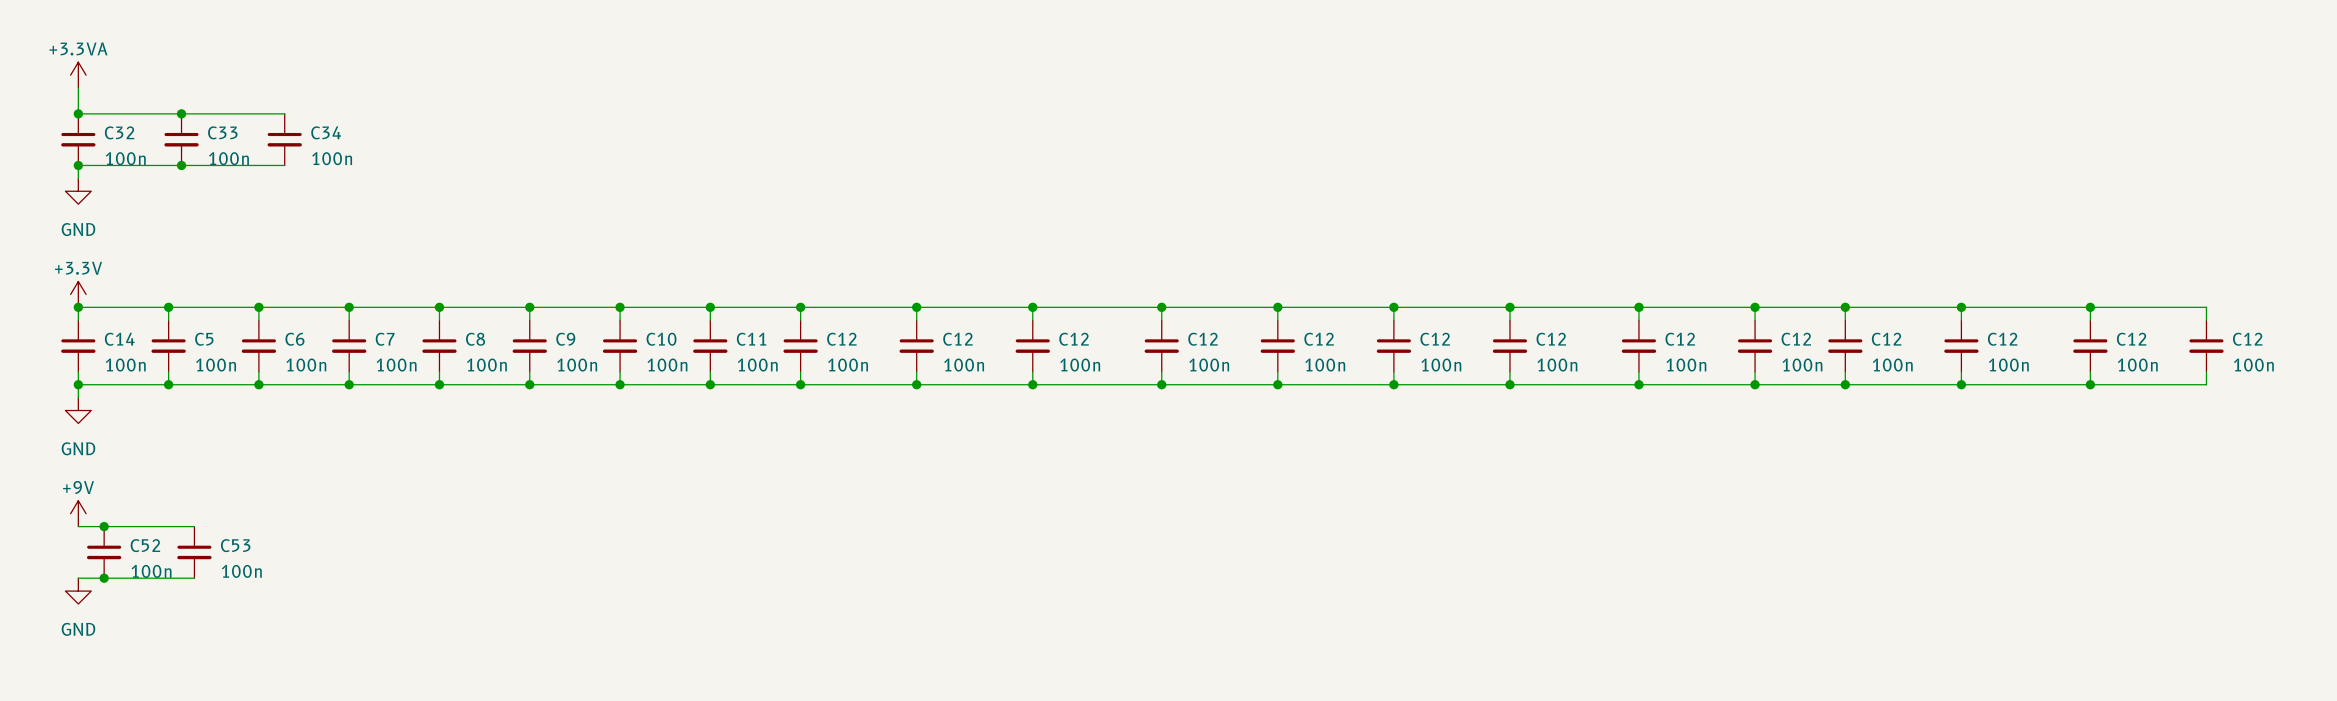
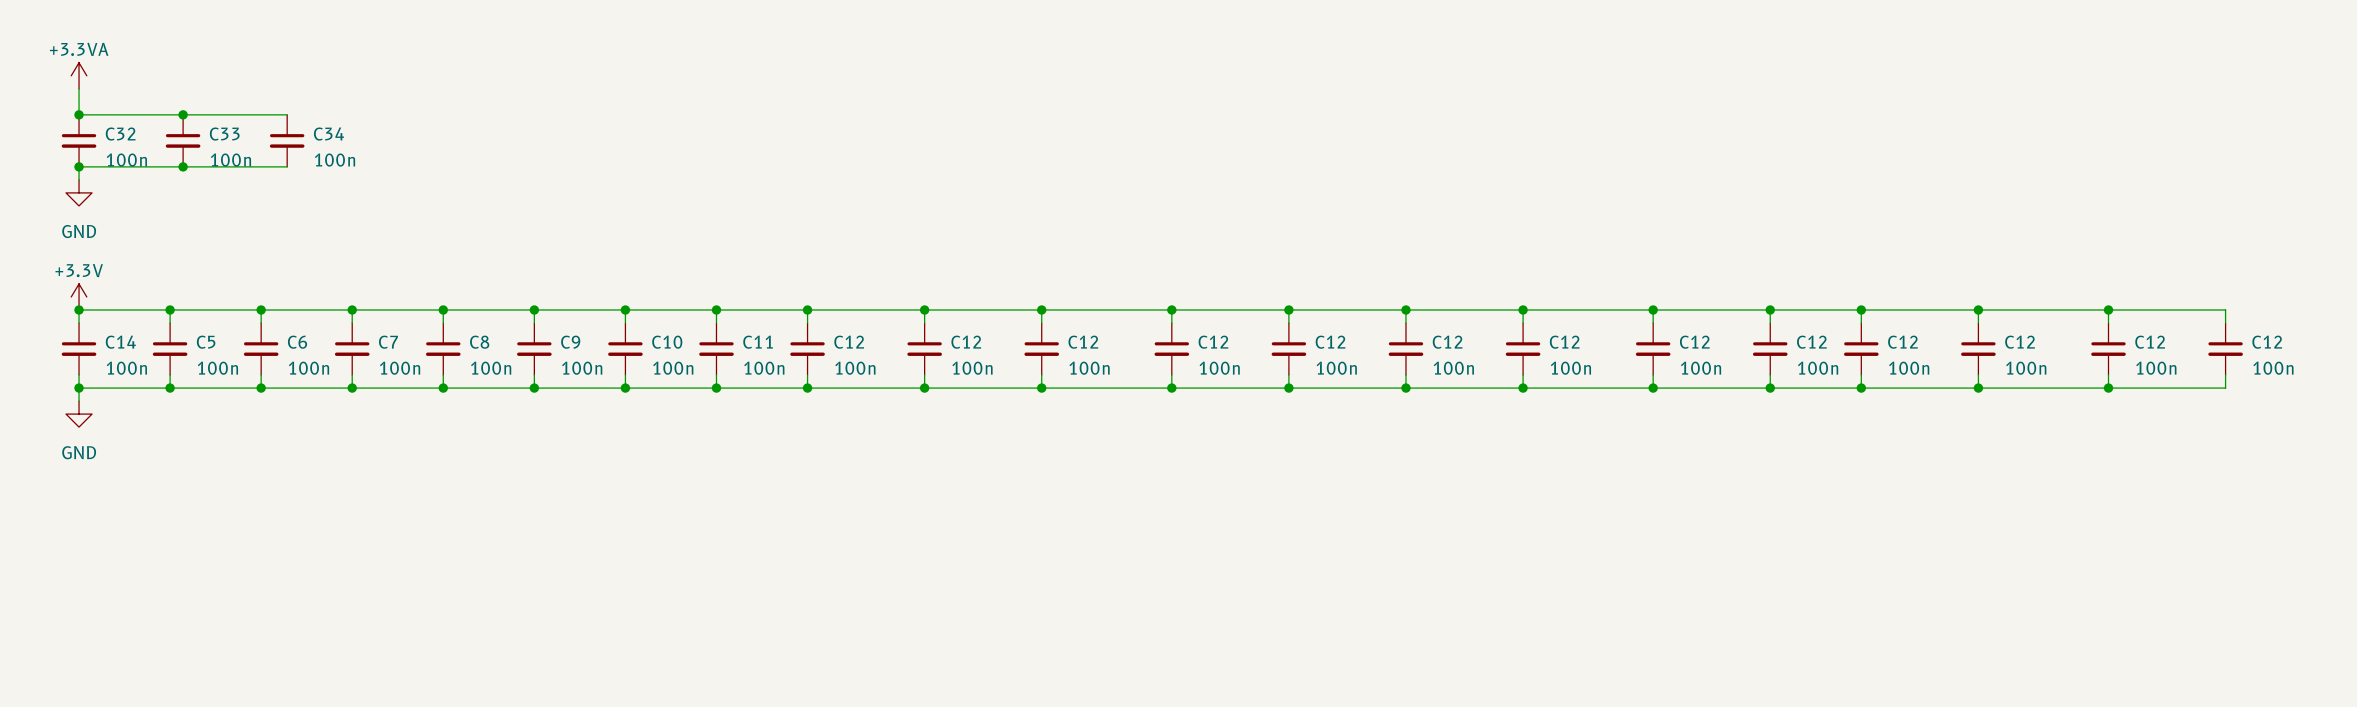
power symbol: +9V (78, 513) -> none
wire: (78, 526) (194, 526) -> none
junction: (104, 526) -> none
C52: 100n (104, 552) -> none
C53: 100n (194, 552) -> none
wire: (78, 578) (194, 578) -> none
junction: (104, 578) -> none
power symbol: GND (78, 591) -> none

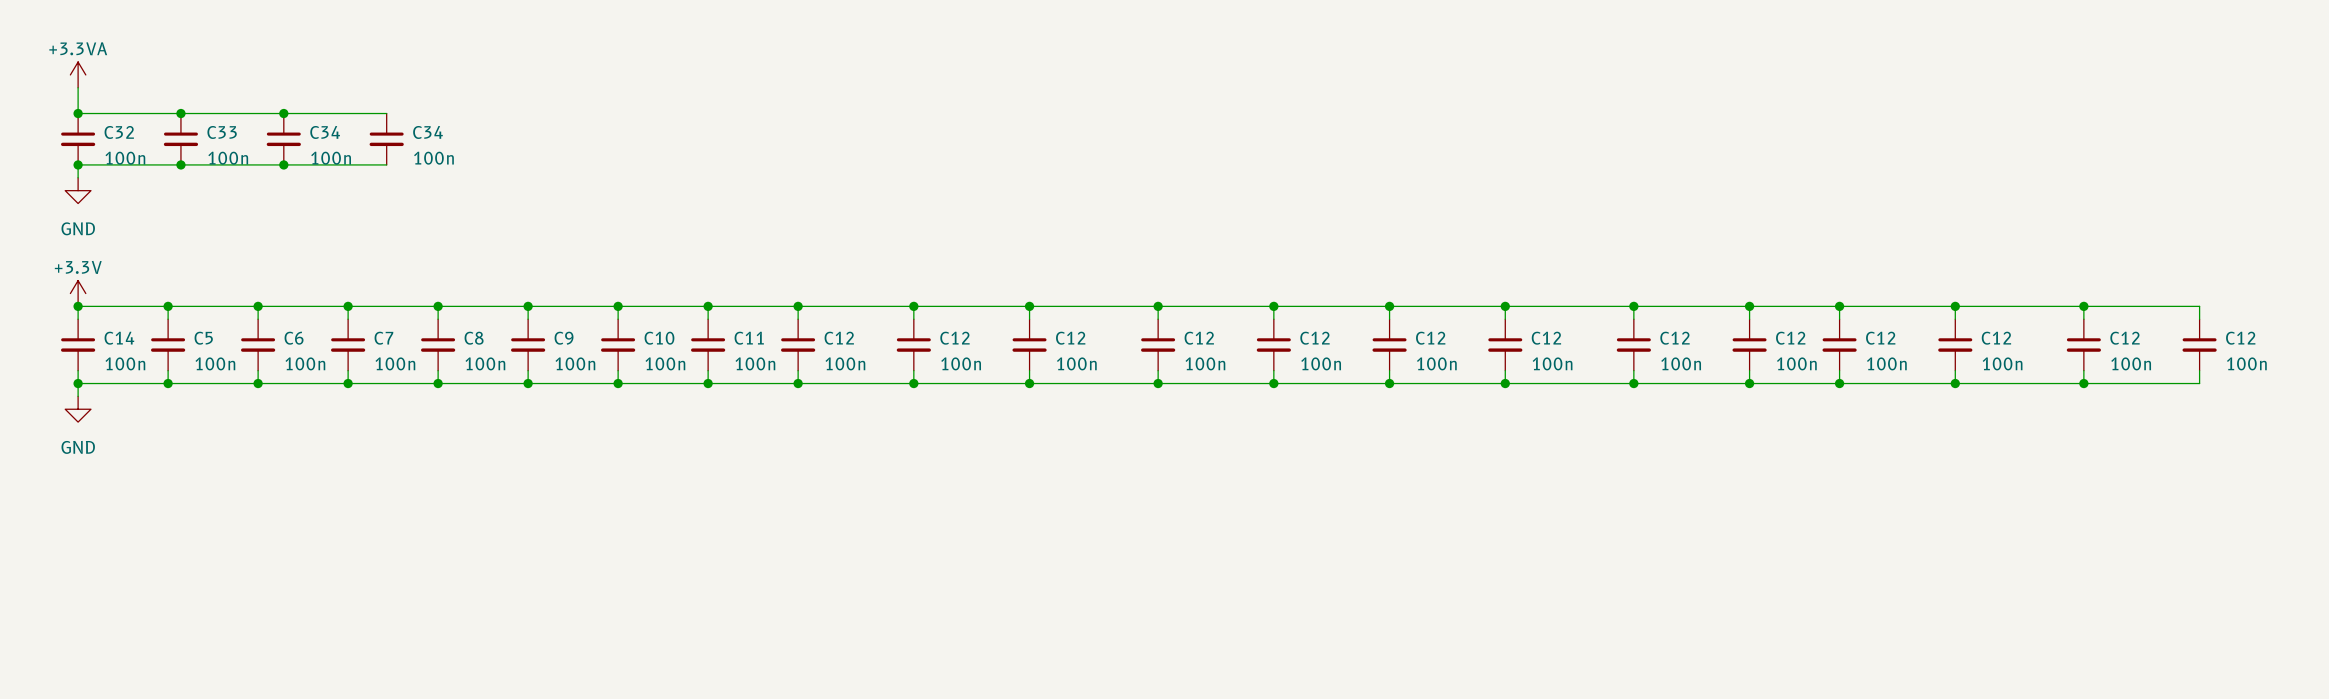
wire: none -> (283, 113) (386, 113)
junction: none -> (283, 113)
C34: none -> 100n (386, 139)
wire: none -> (283, 164) (386, 164)
junction: none -> (283, 164)

